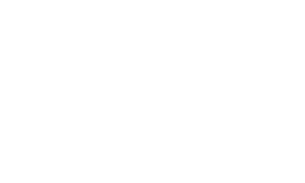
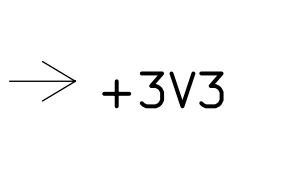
power symbol: none -> +3V3 (42, 81)

